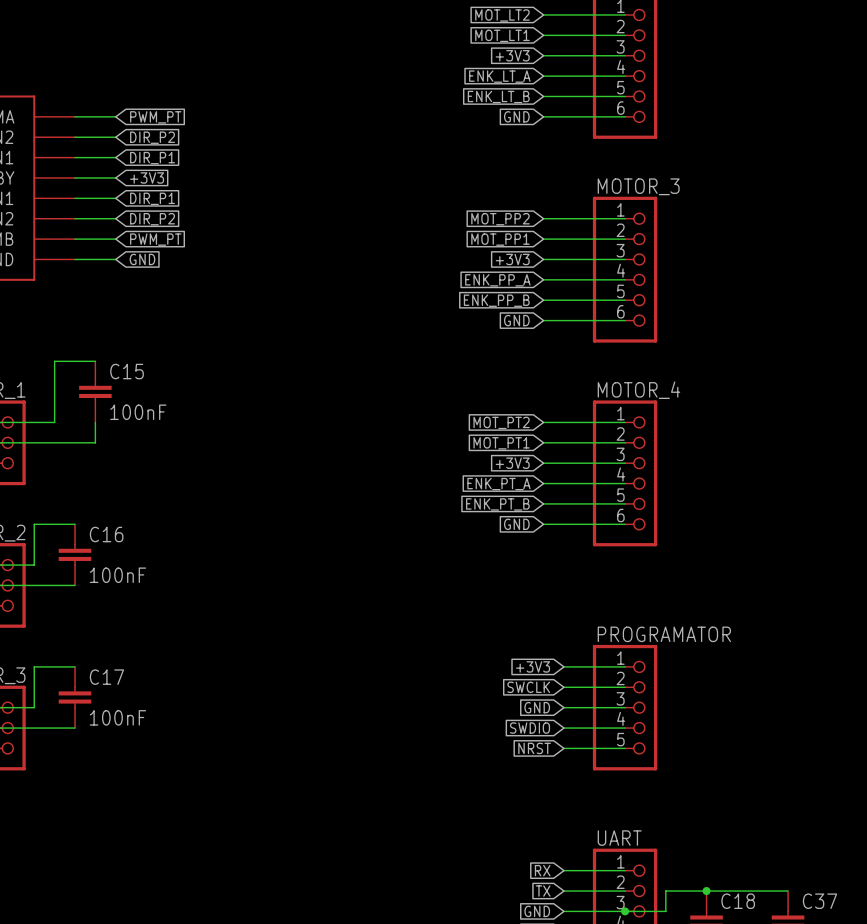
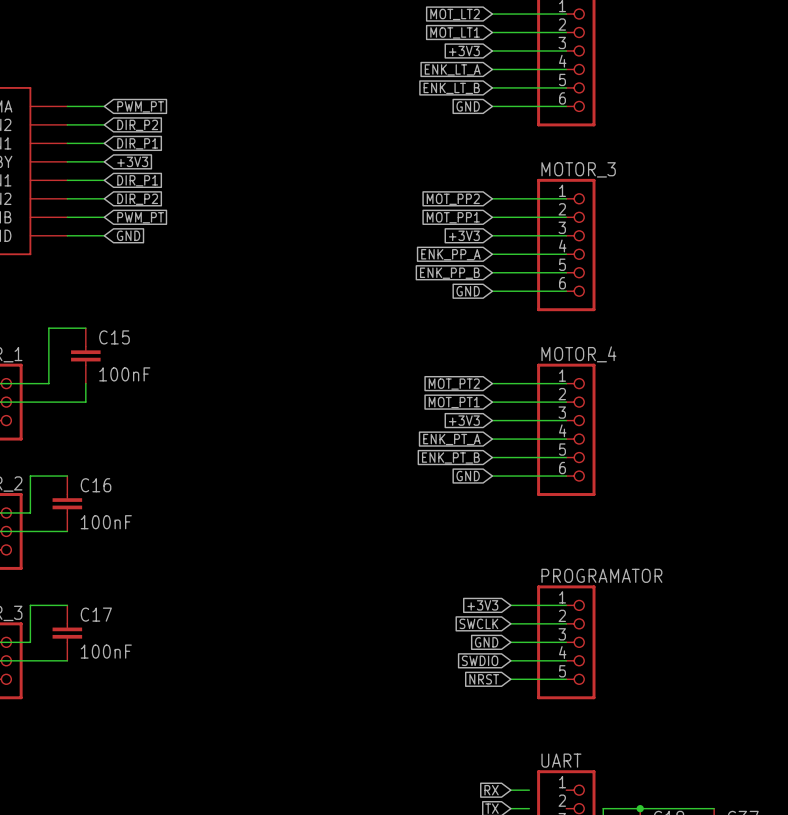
wire: (584, 870) (625, 870) -> none
wire: (584, 891) (625, 891) -> none

